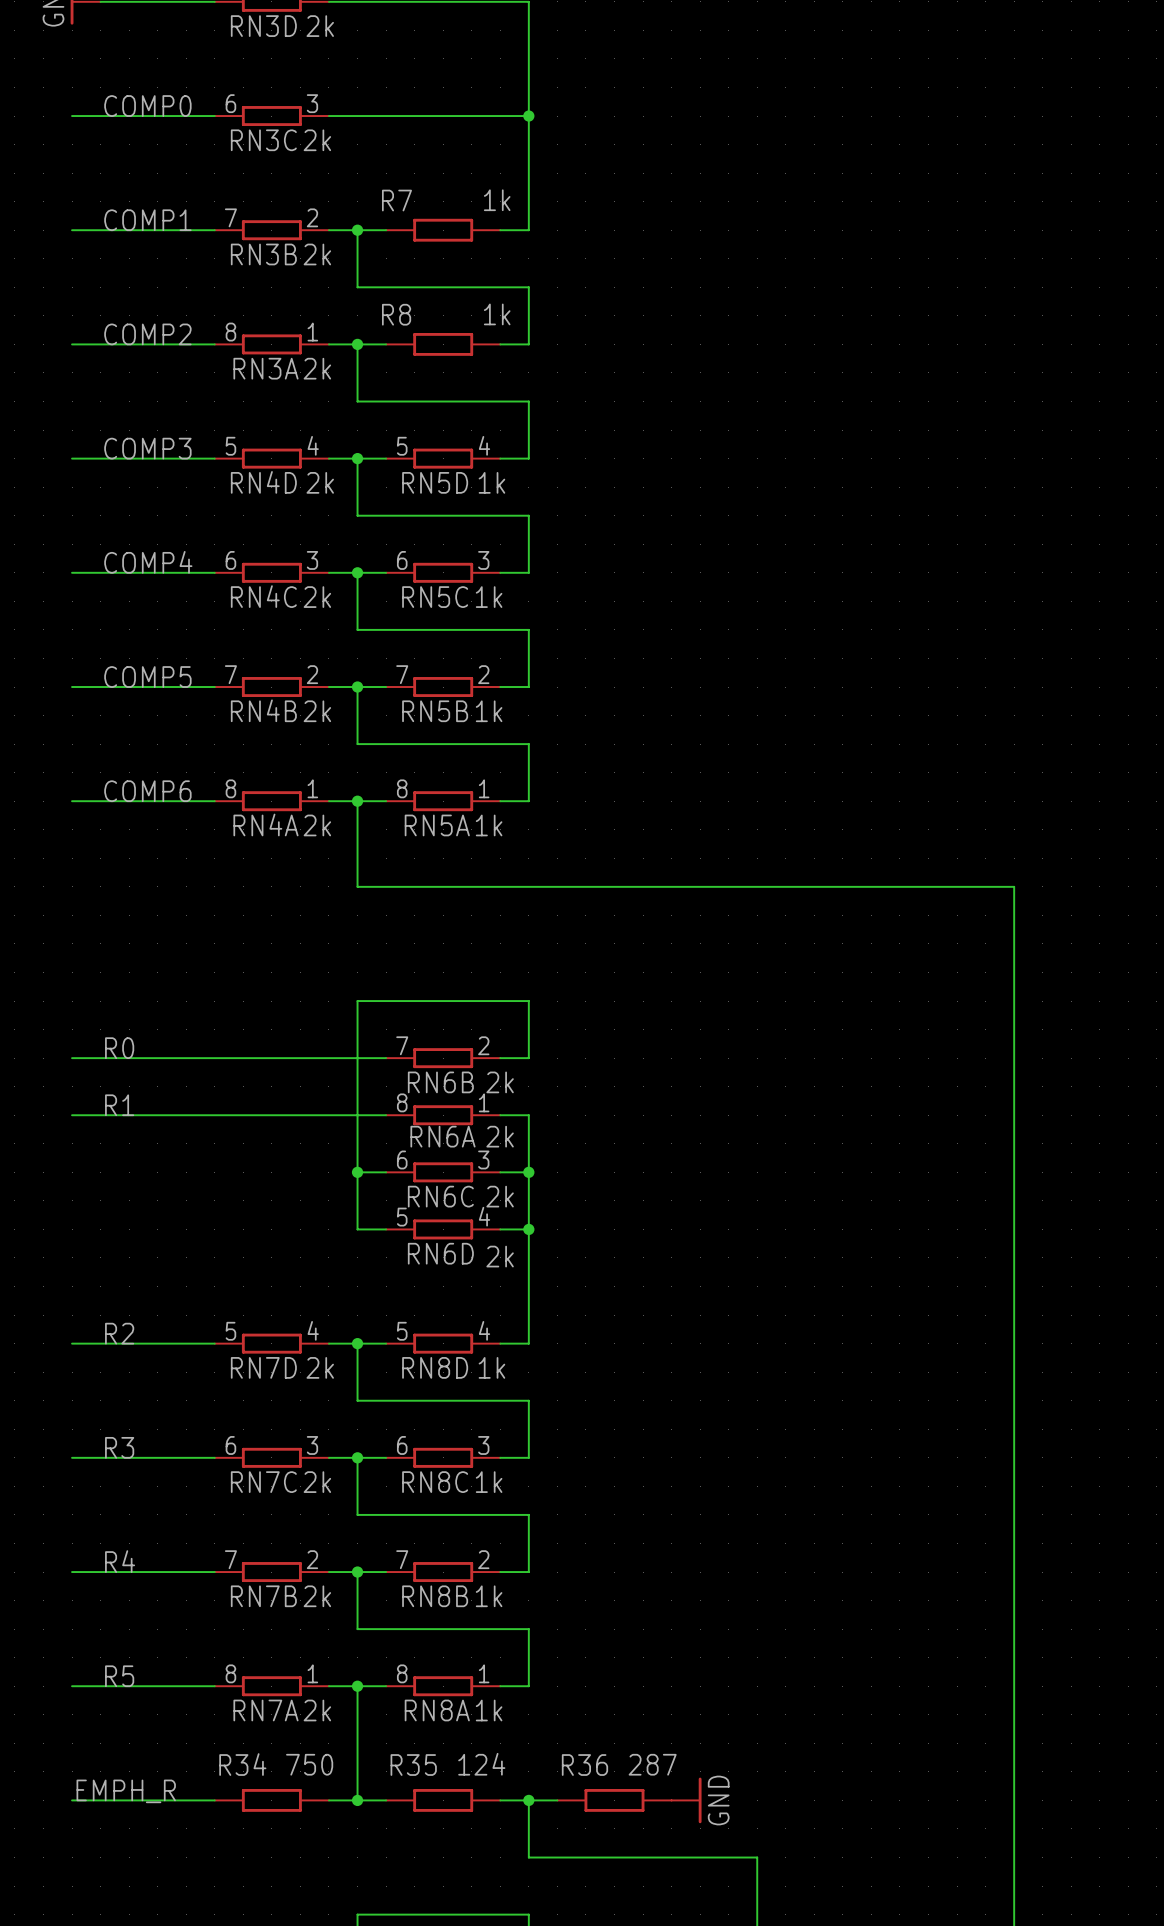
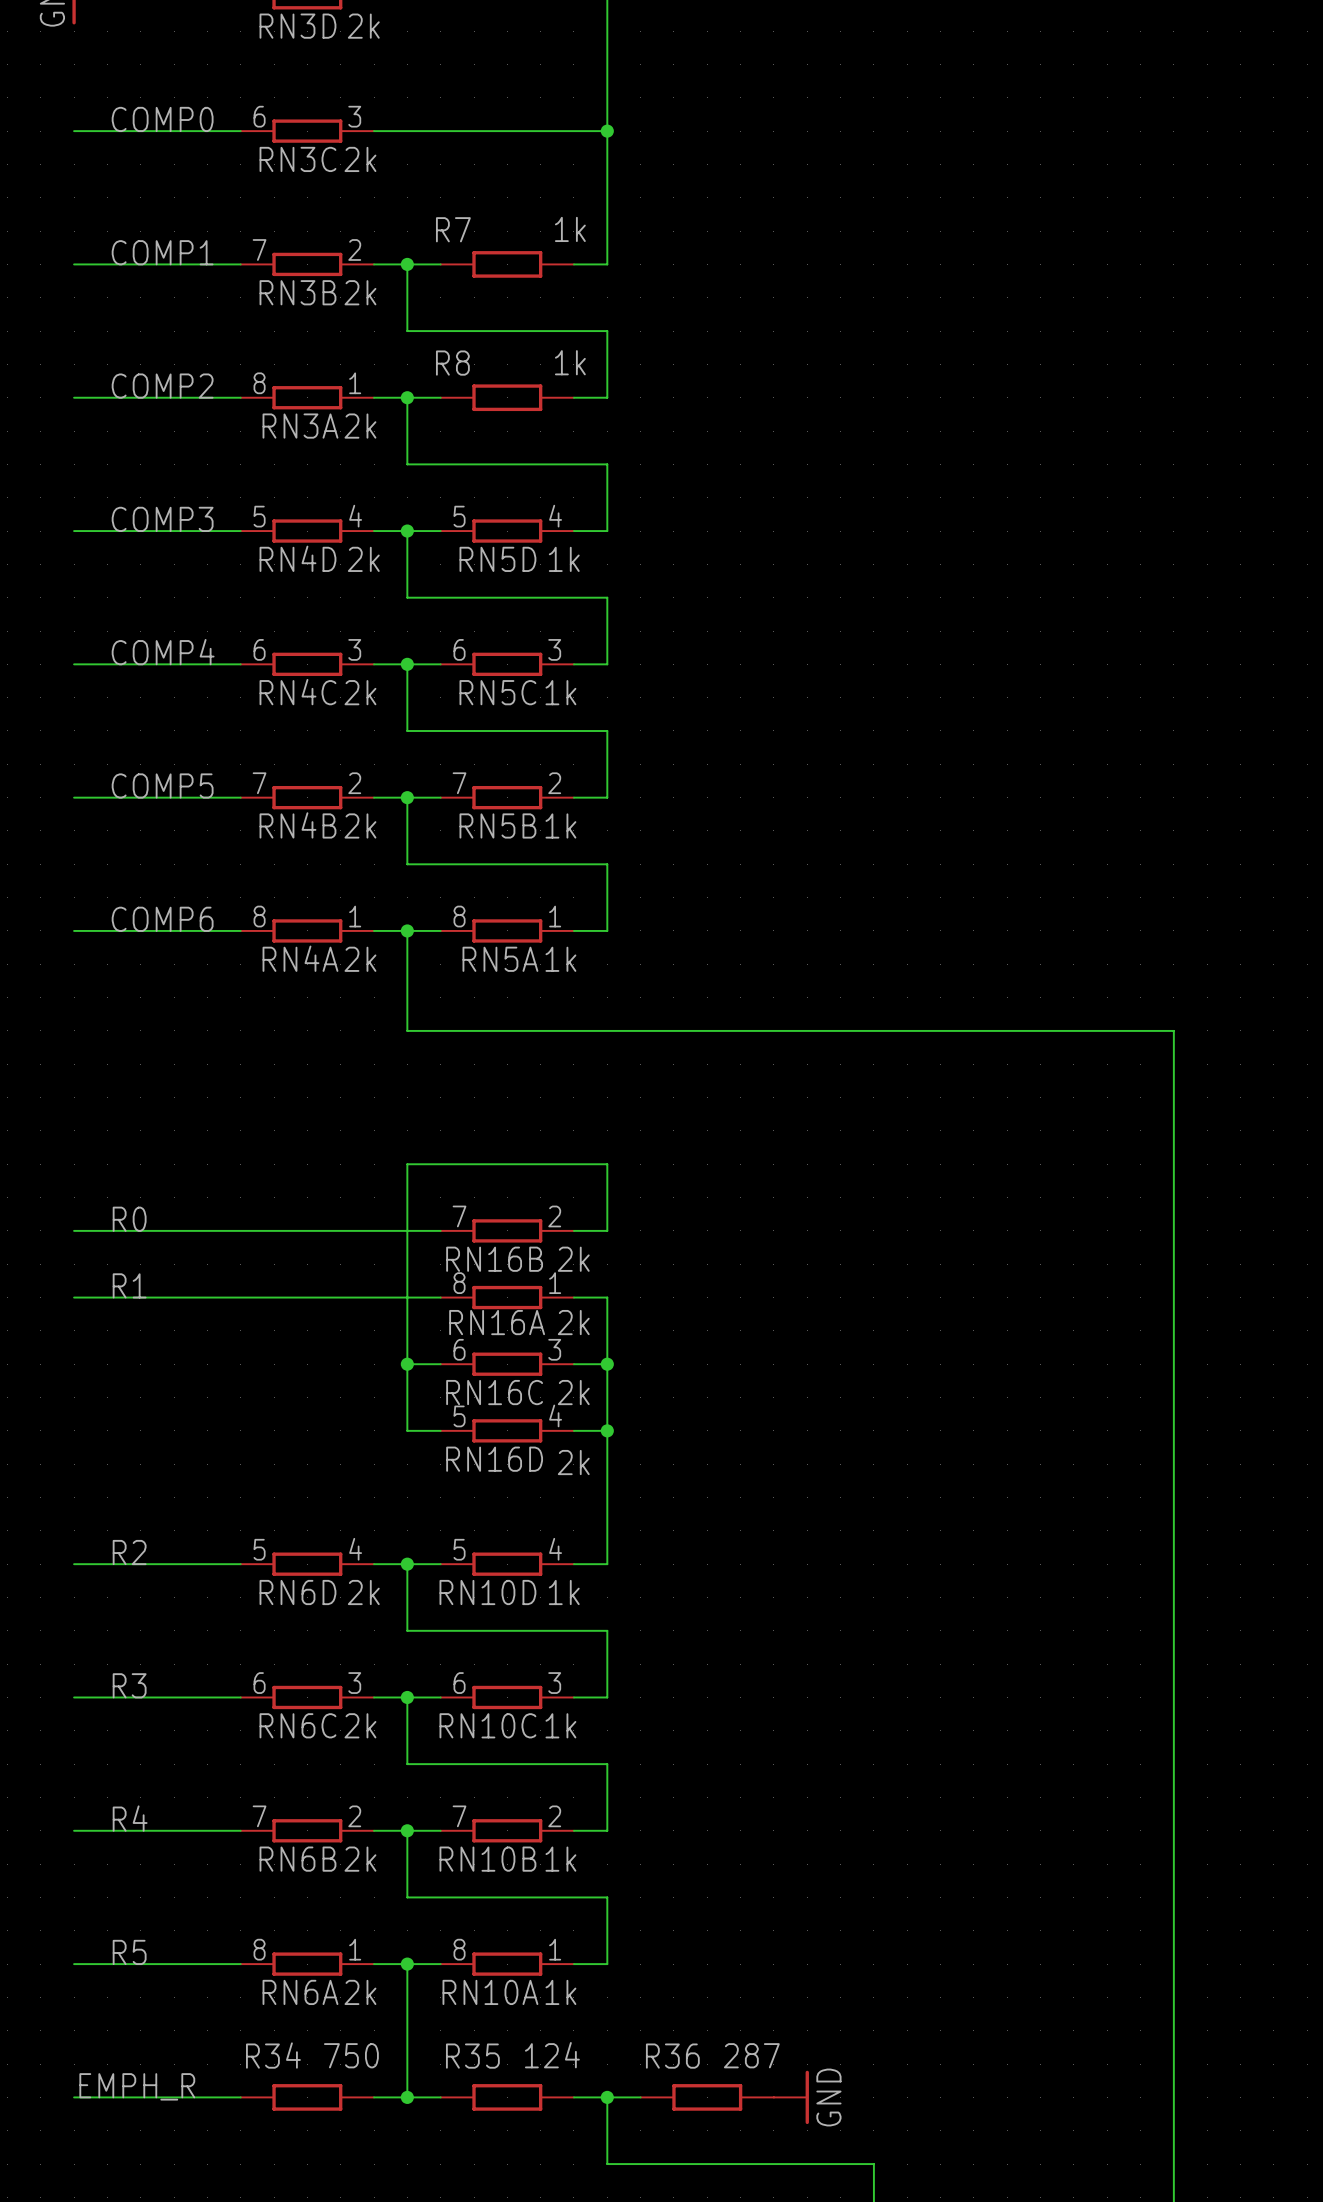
RN6B name: RN6B (440, 1082) -> RN16B (494, 1259)
RN6A name: RN6A (442, 1136) -> RN16A (497, 1322)
RN6C name: RN6C (440, 1196) -> RN16C (494, 1392)
RN6D name: RN6D (440, 1253) -> RN16D (494, 1459)
RN7D name: RN7D (263, 1367) -> RN6D (297, 1592)
RN8D name: RN8D (435, 1367) -> RN10D (487, 1592)
RN7C name: RN7C (263, 1482) -> RN6C (297, 1725)
RN8C name: RN8C (435, 1482) -> RN10C (487, 1725)
RN7B name: RN7B (263, 1596) -> RN6B (297, 1859)
RN8B name: RN8B (435, 1596) -> RN10B (487, 1859)
RN7A name: RN7A (265, 1710) -> RN6A (300, 1992)
RN8A name: RN8A (437, 1710) -> RN10A (490, 1992)

